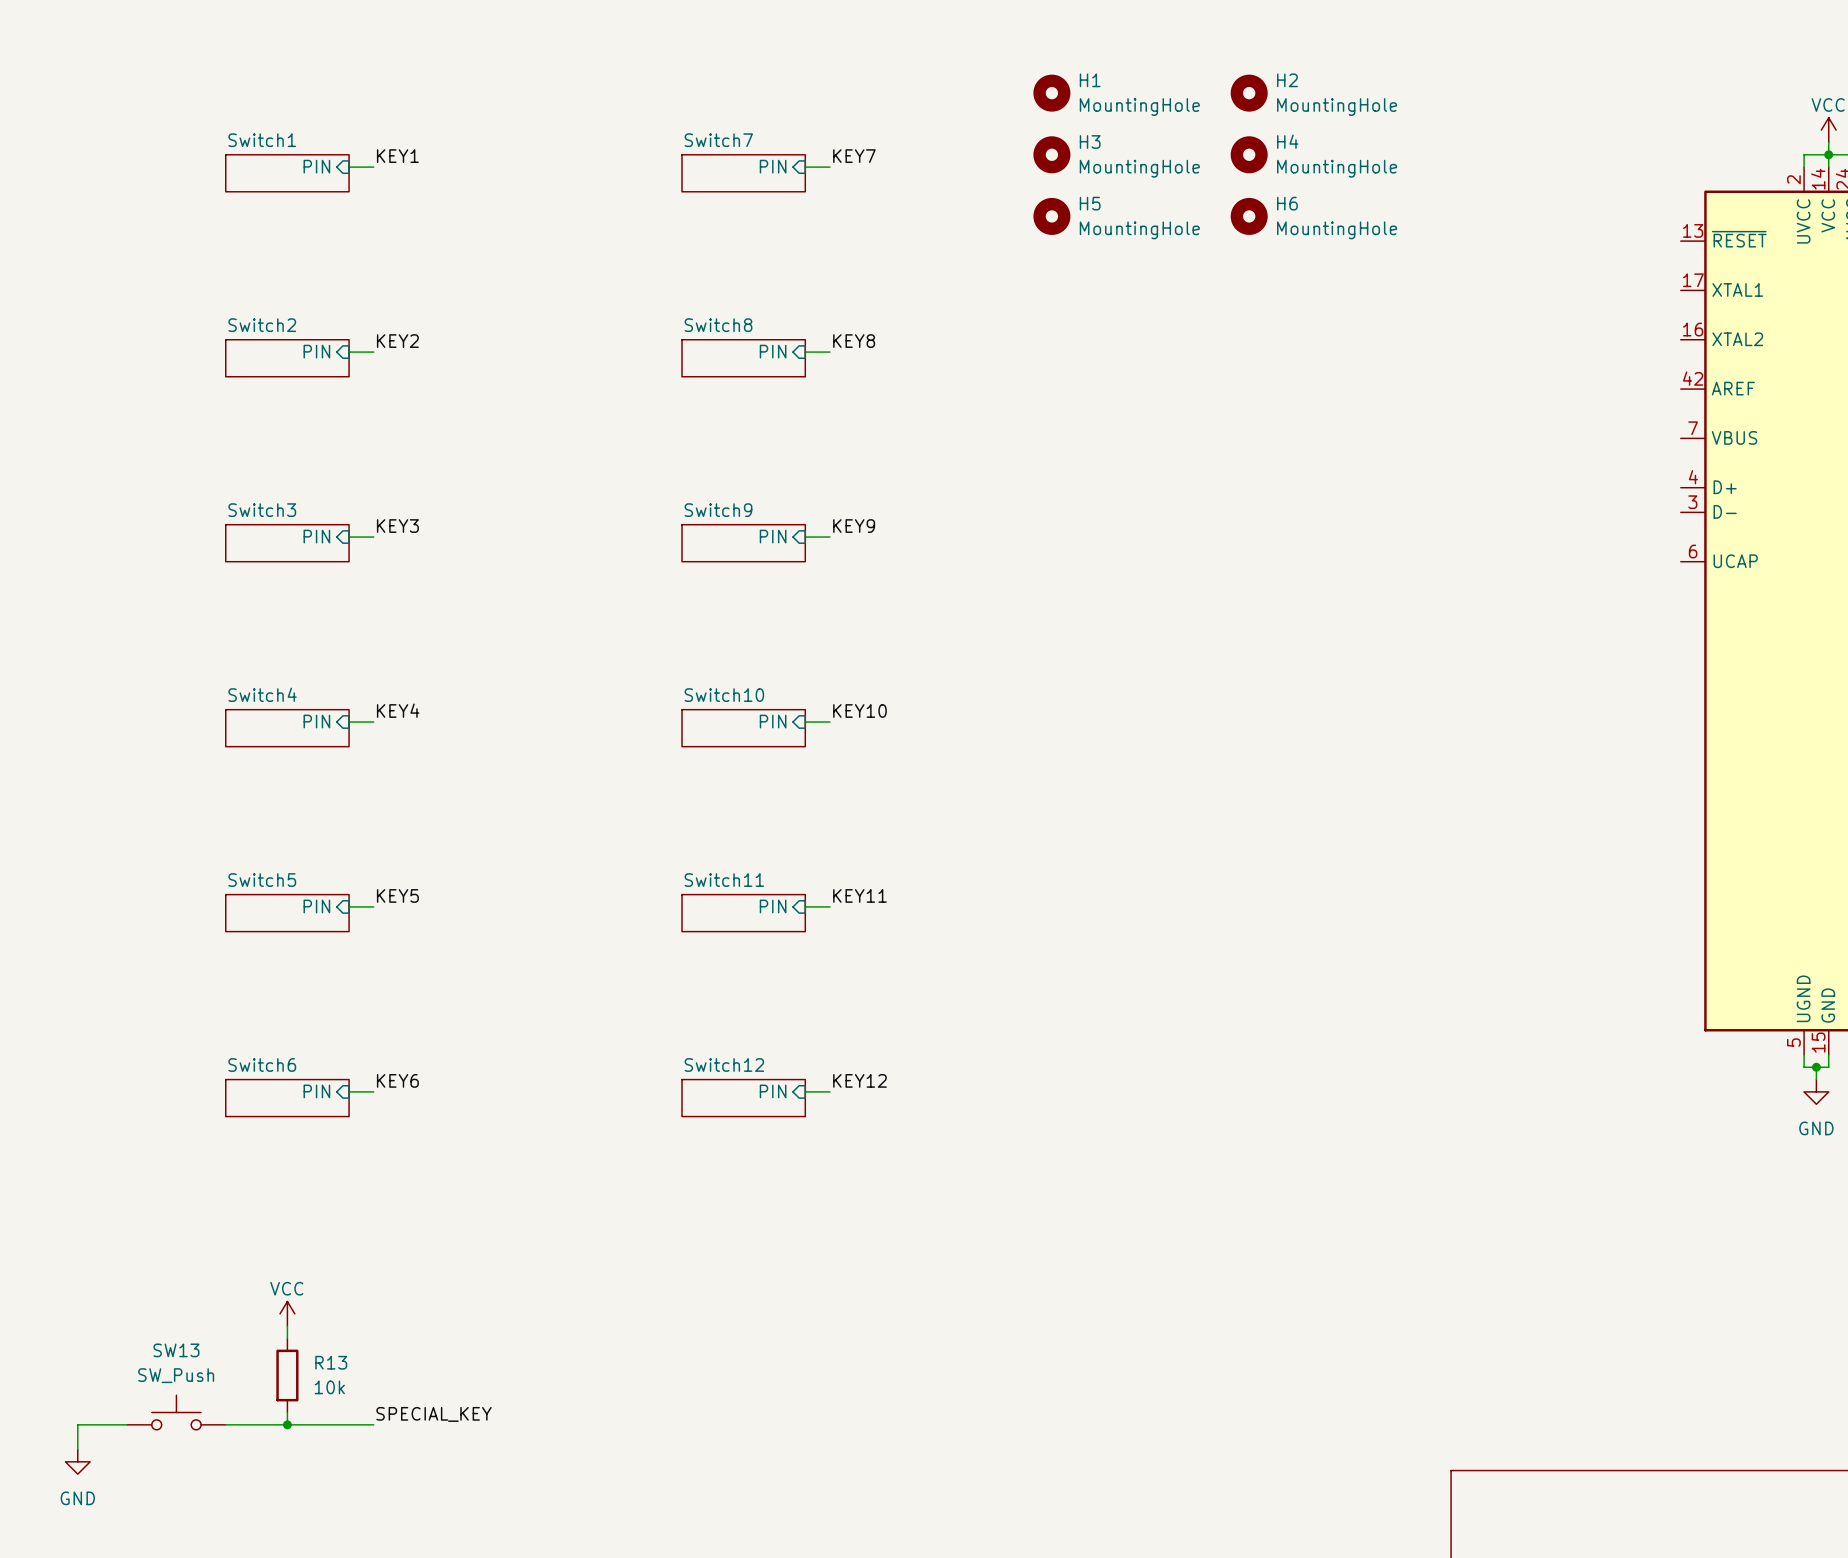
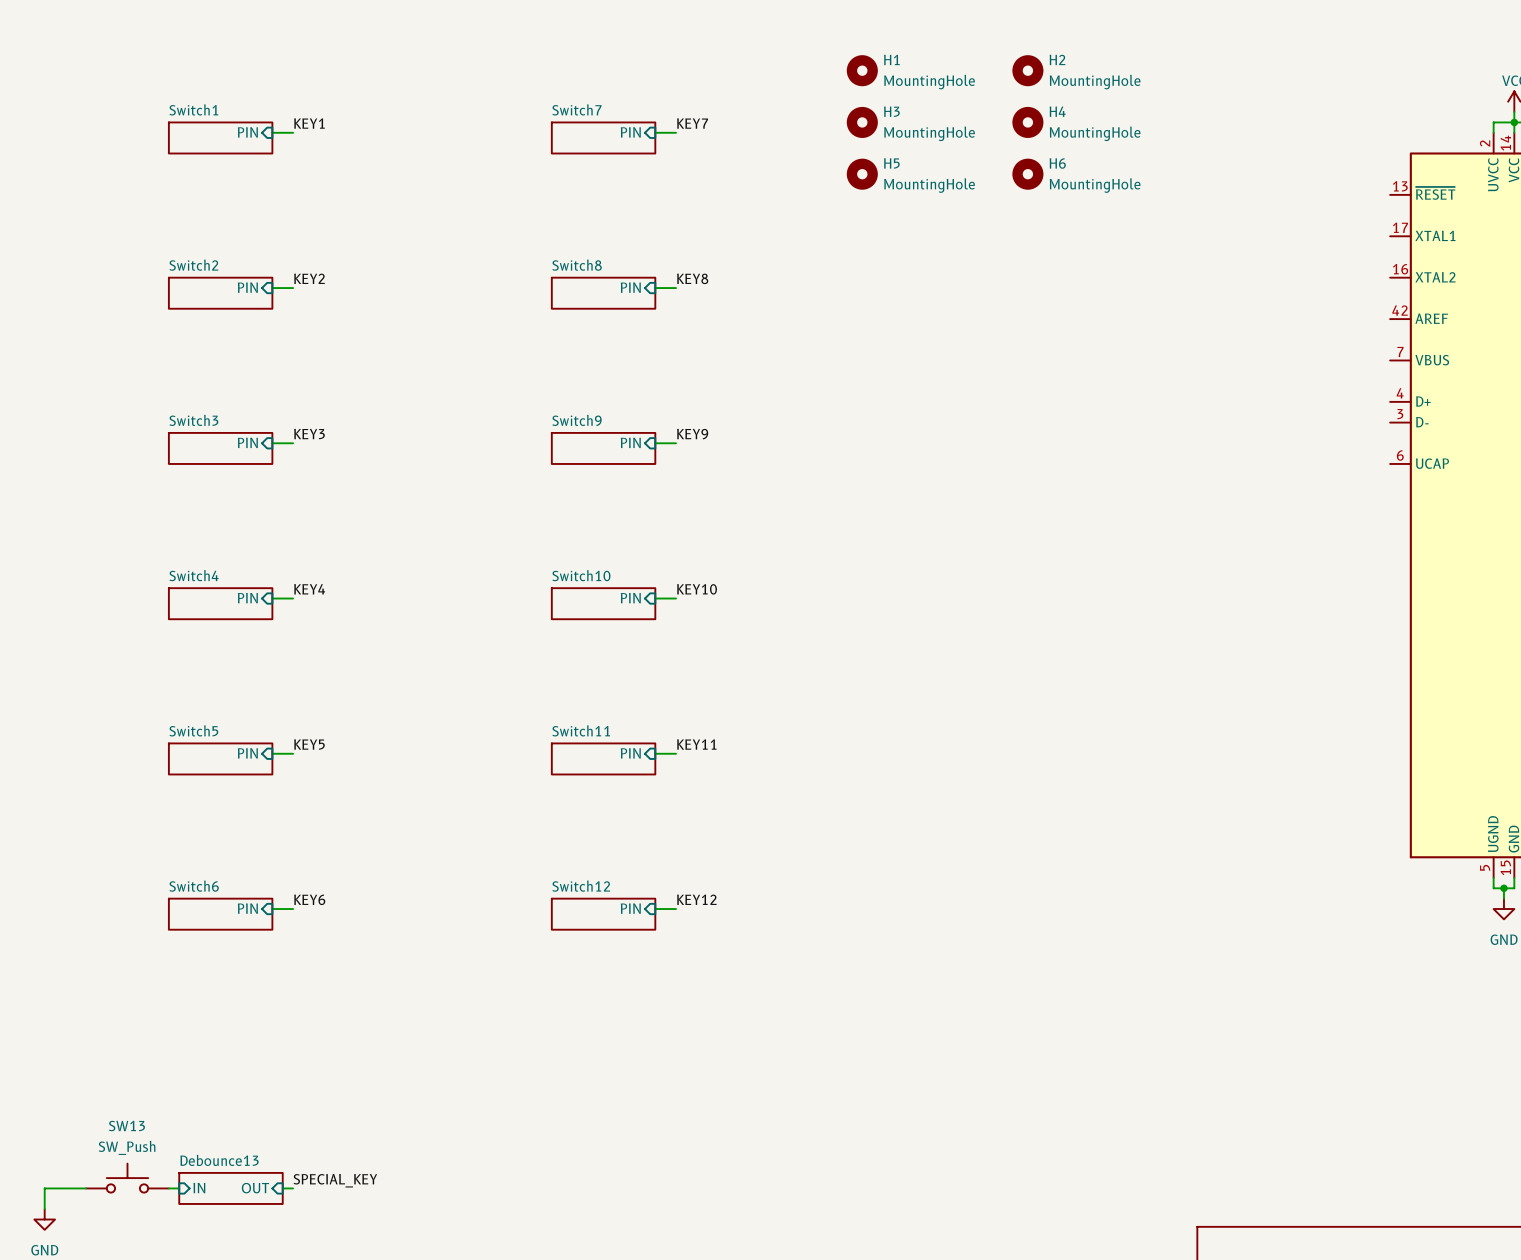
power symbol: VCC (287, 1313) -> none
wire: (287, 1326) (287, 1338) -> none
R13: 10k (287, 1375) -> none
wire: (287, 1412) (287, 1424) -> none
wire: (238, 1424) (361, 1424) -> none
sheet pin: none -> IN (199, 1188)
junction: (287, 1424) -> none
sheet Debounce13: none -> (230, 1188)
sheet pin: none -> OUT (255, 1188)

